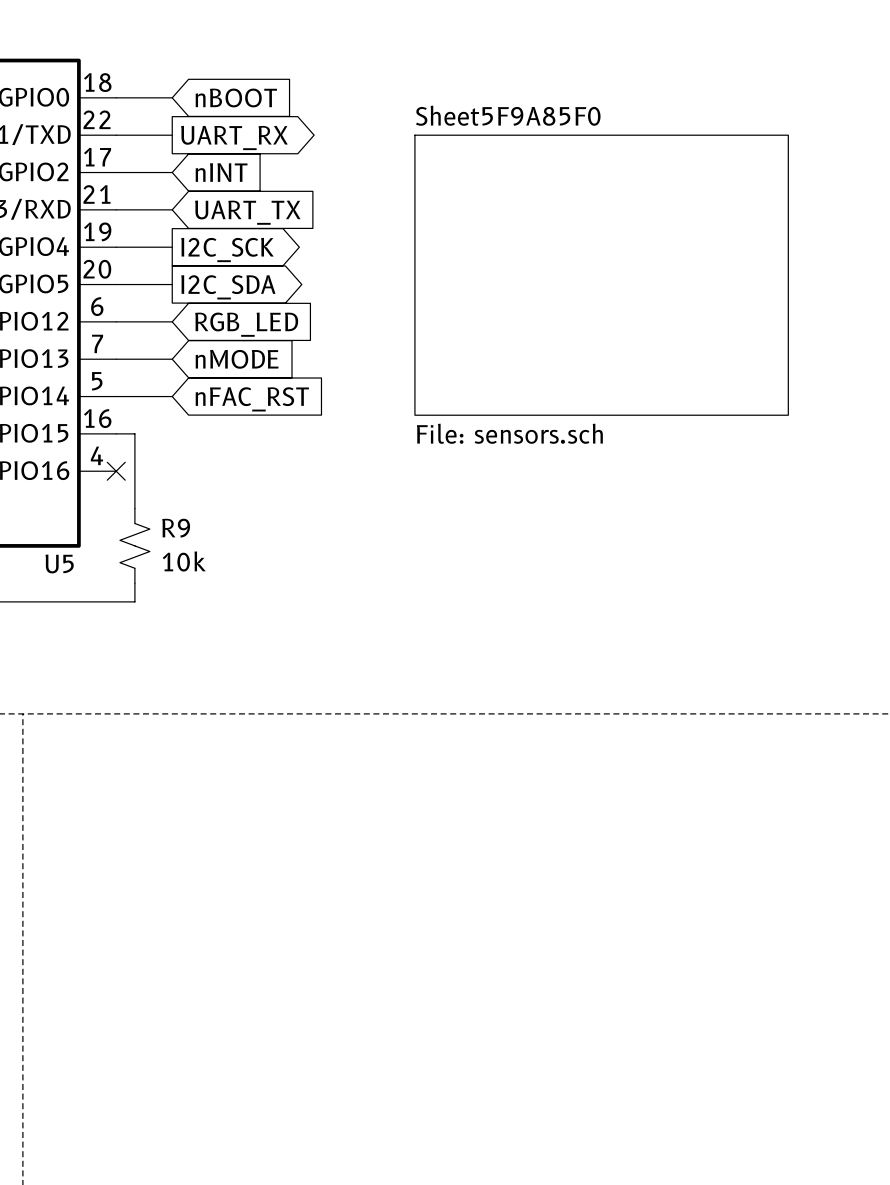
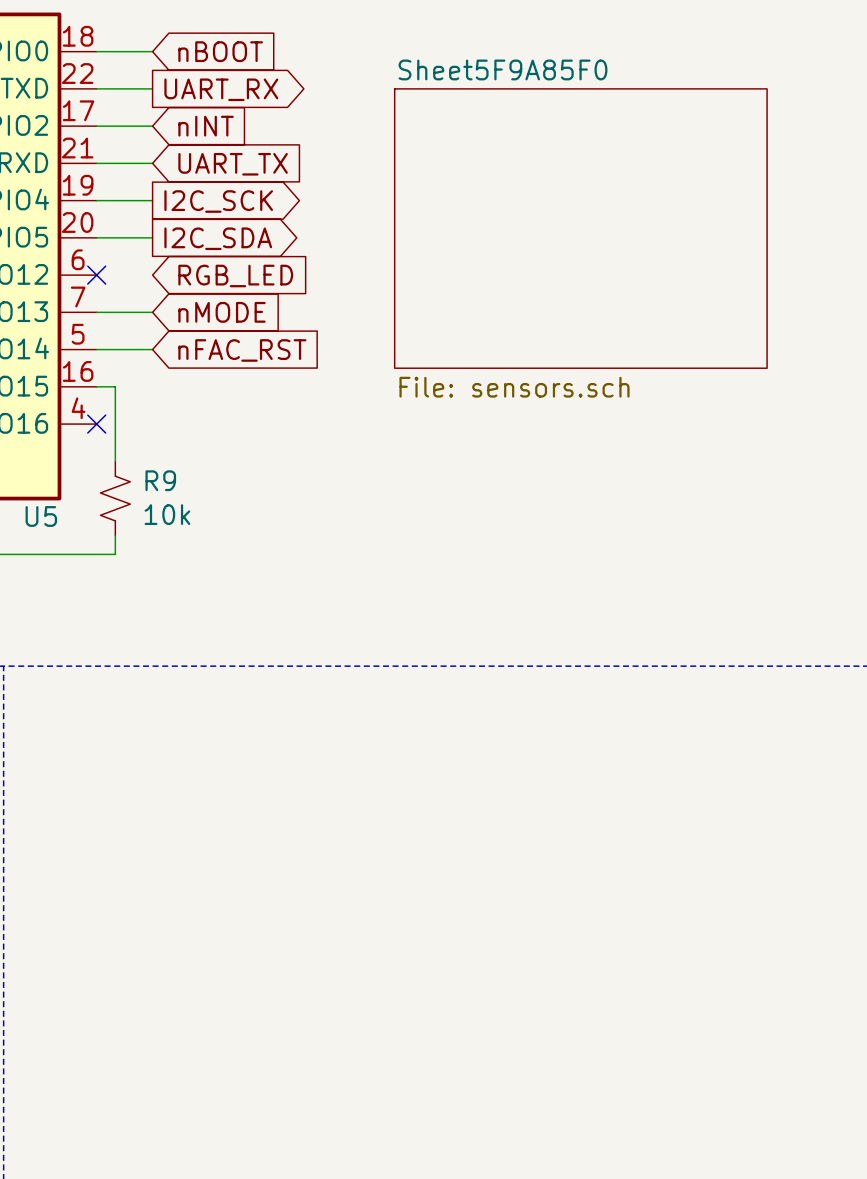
wire: (116, 321) (172, 321) -> none
no-connect mark: none -> (96, 275)

